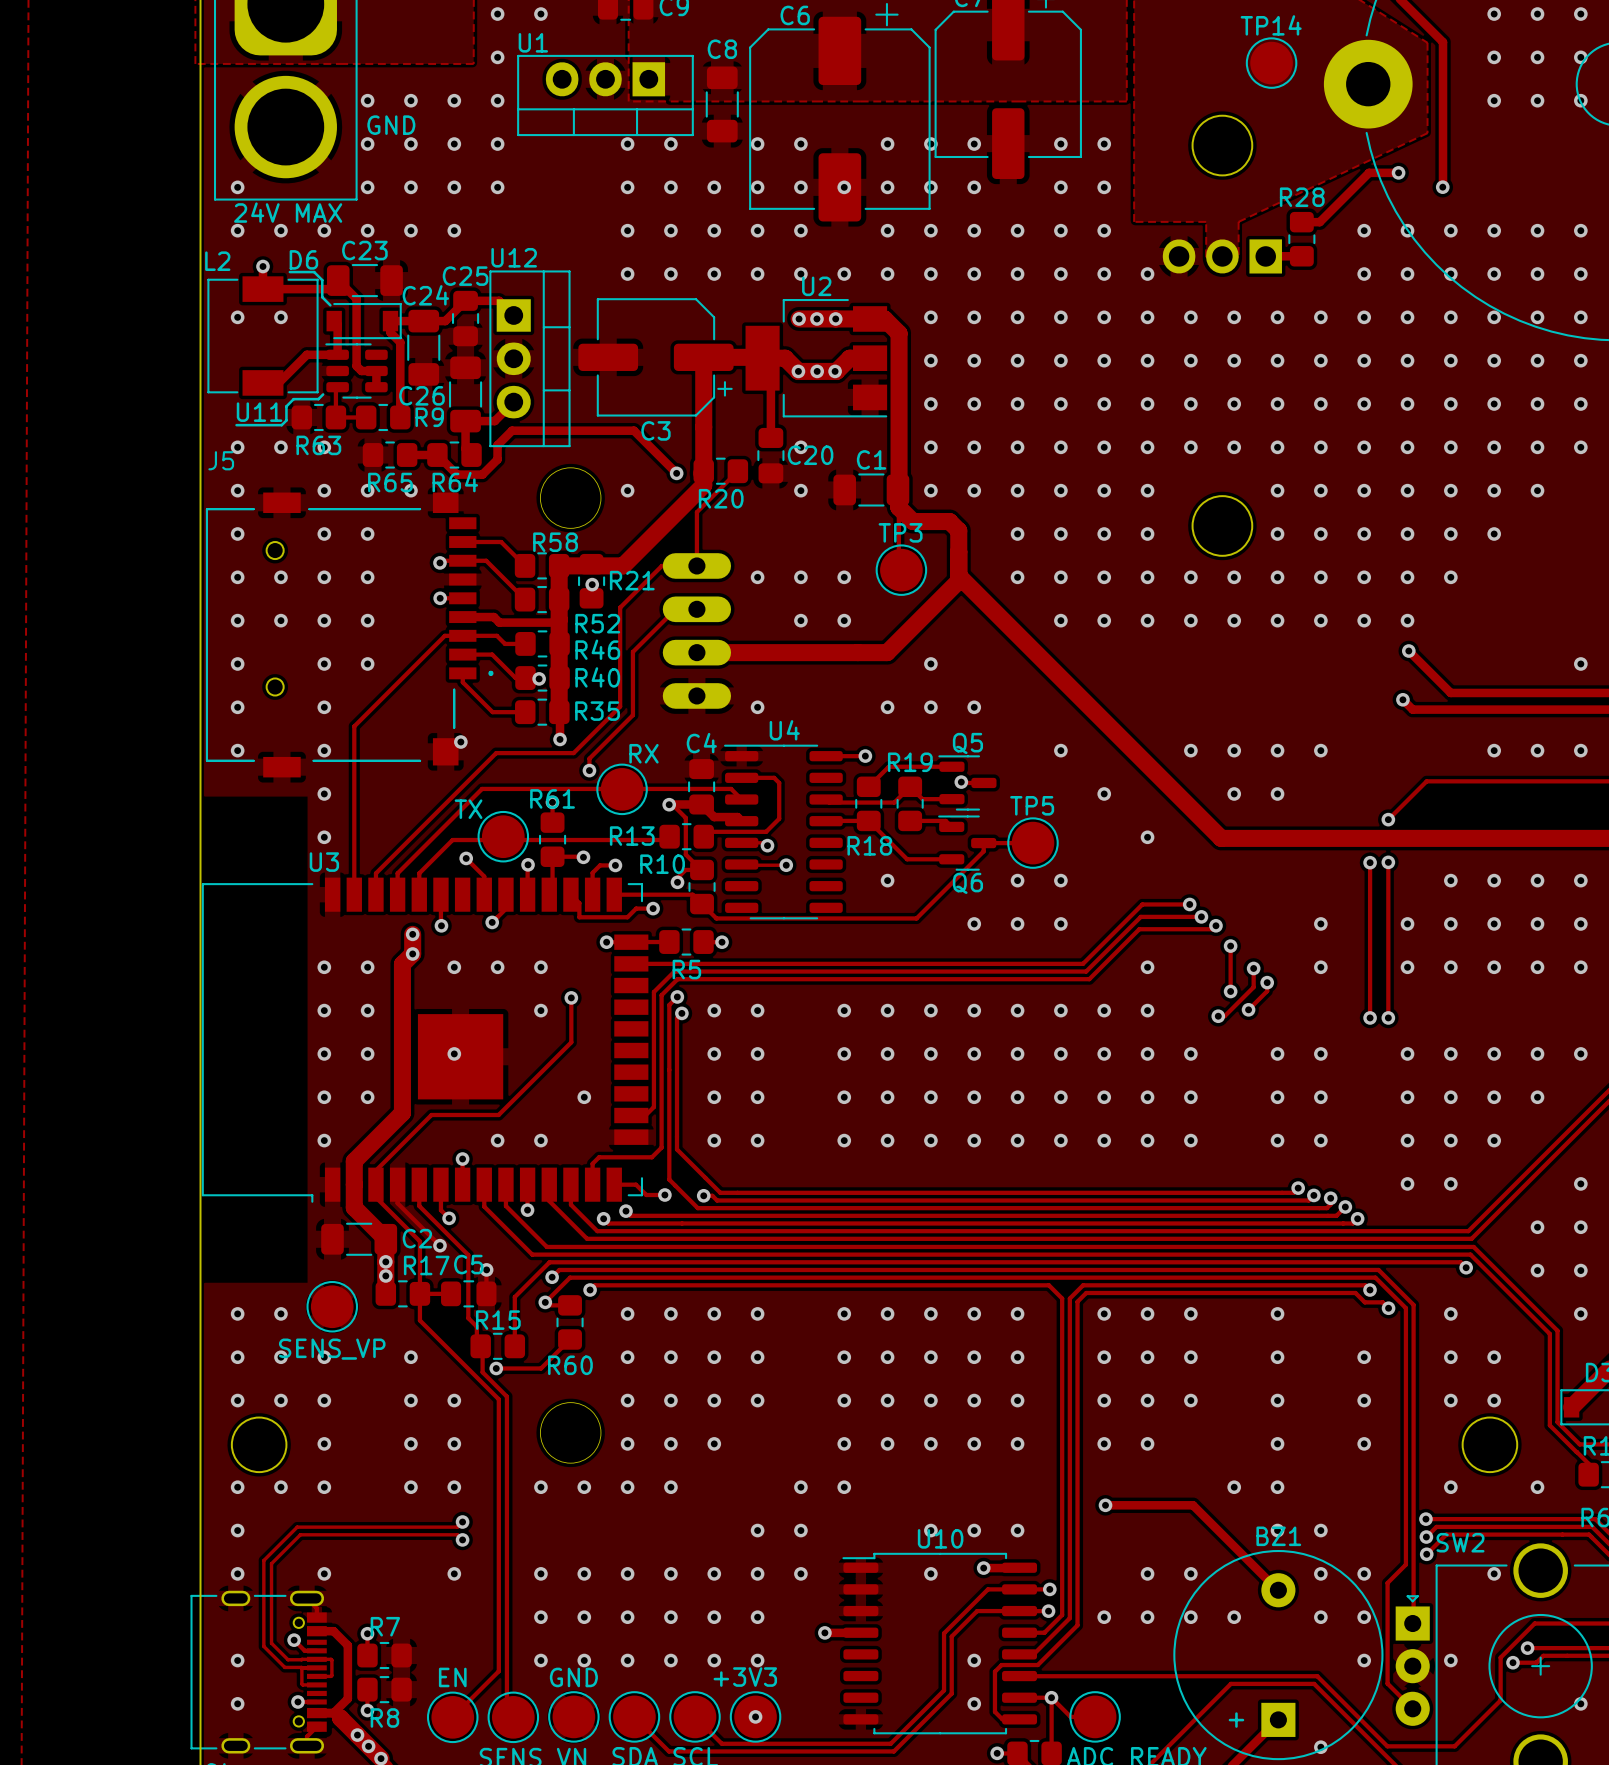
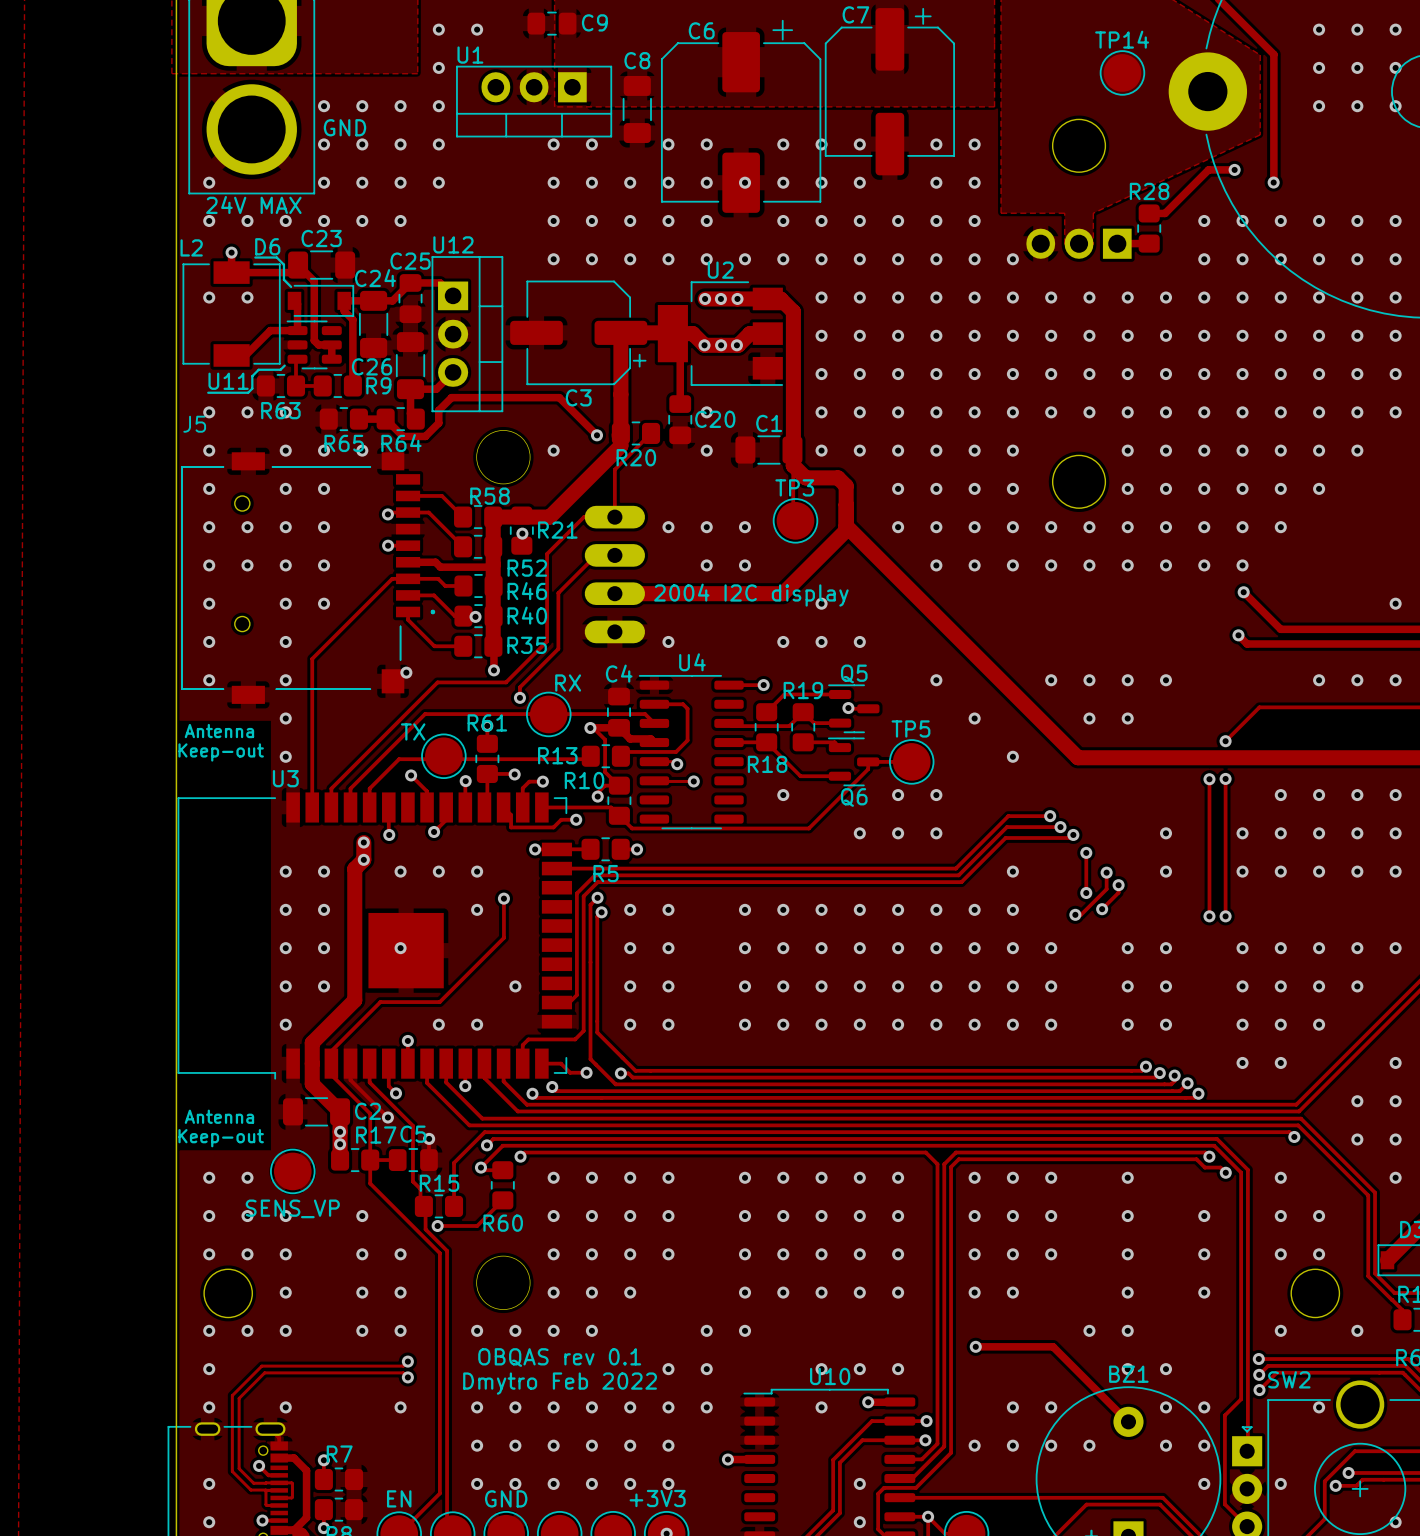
text: none -> 2004 I2C display (751, 595)
text: none -> Antenna (219, 731)
text: none -> Keep-out (221, 752)
text: none -> Antenna (219, 1116)
text: none -> Keep-out (221, 1138)
text: none -> OBQAS rev 0.1 (559, 1357)
text: none -> Dmytro Feb 2022 (560, 1383)

